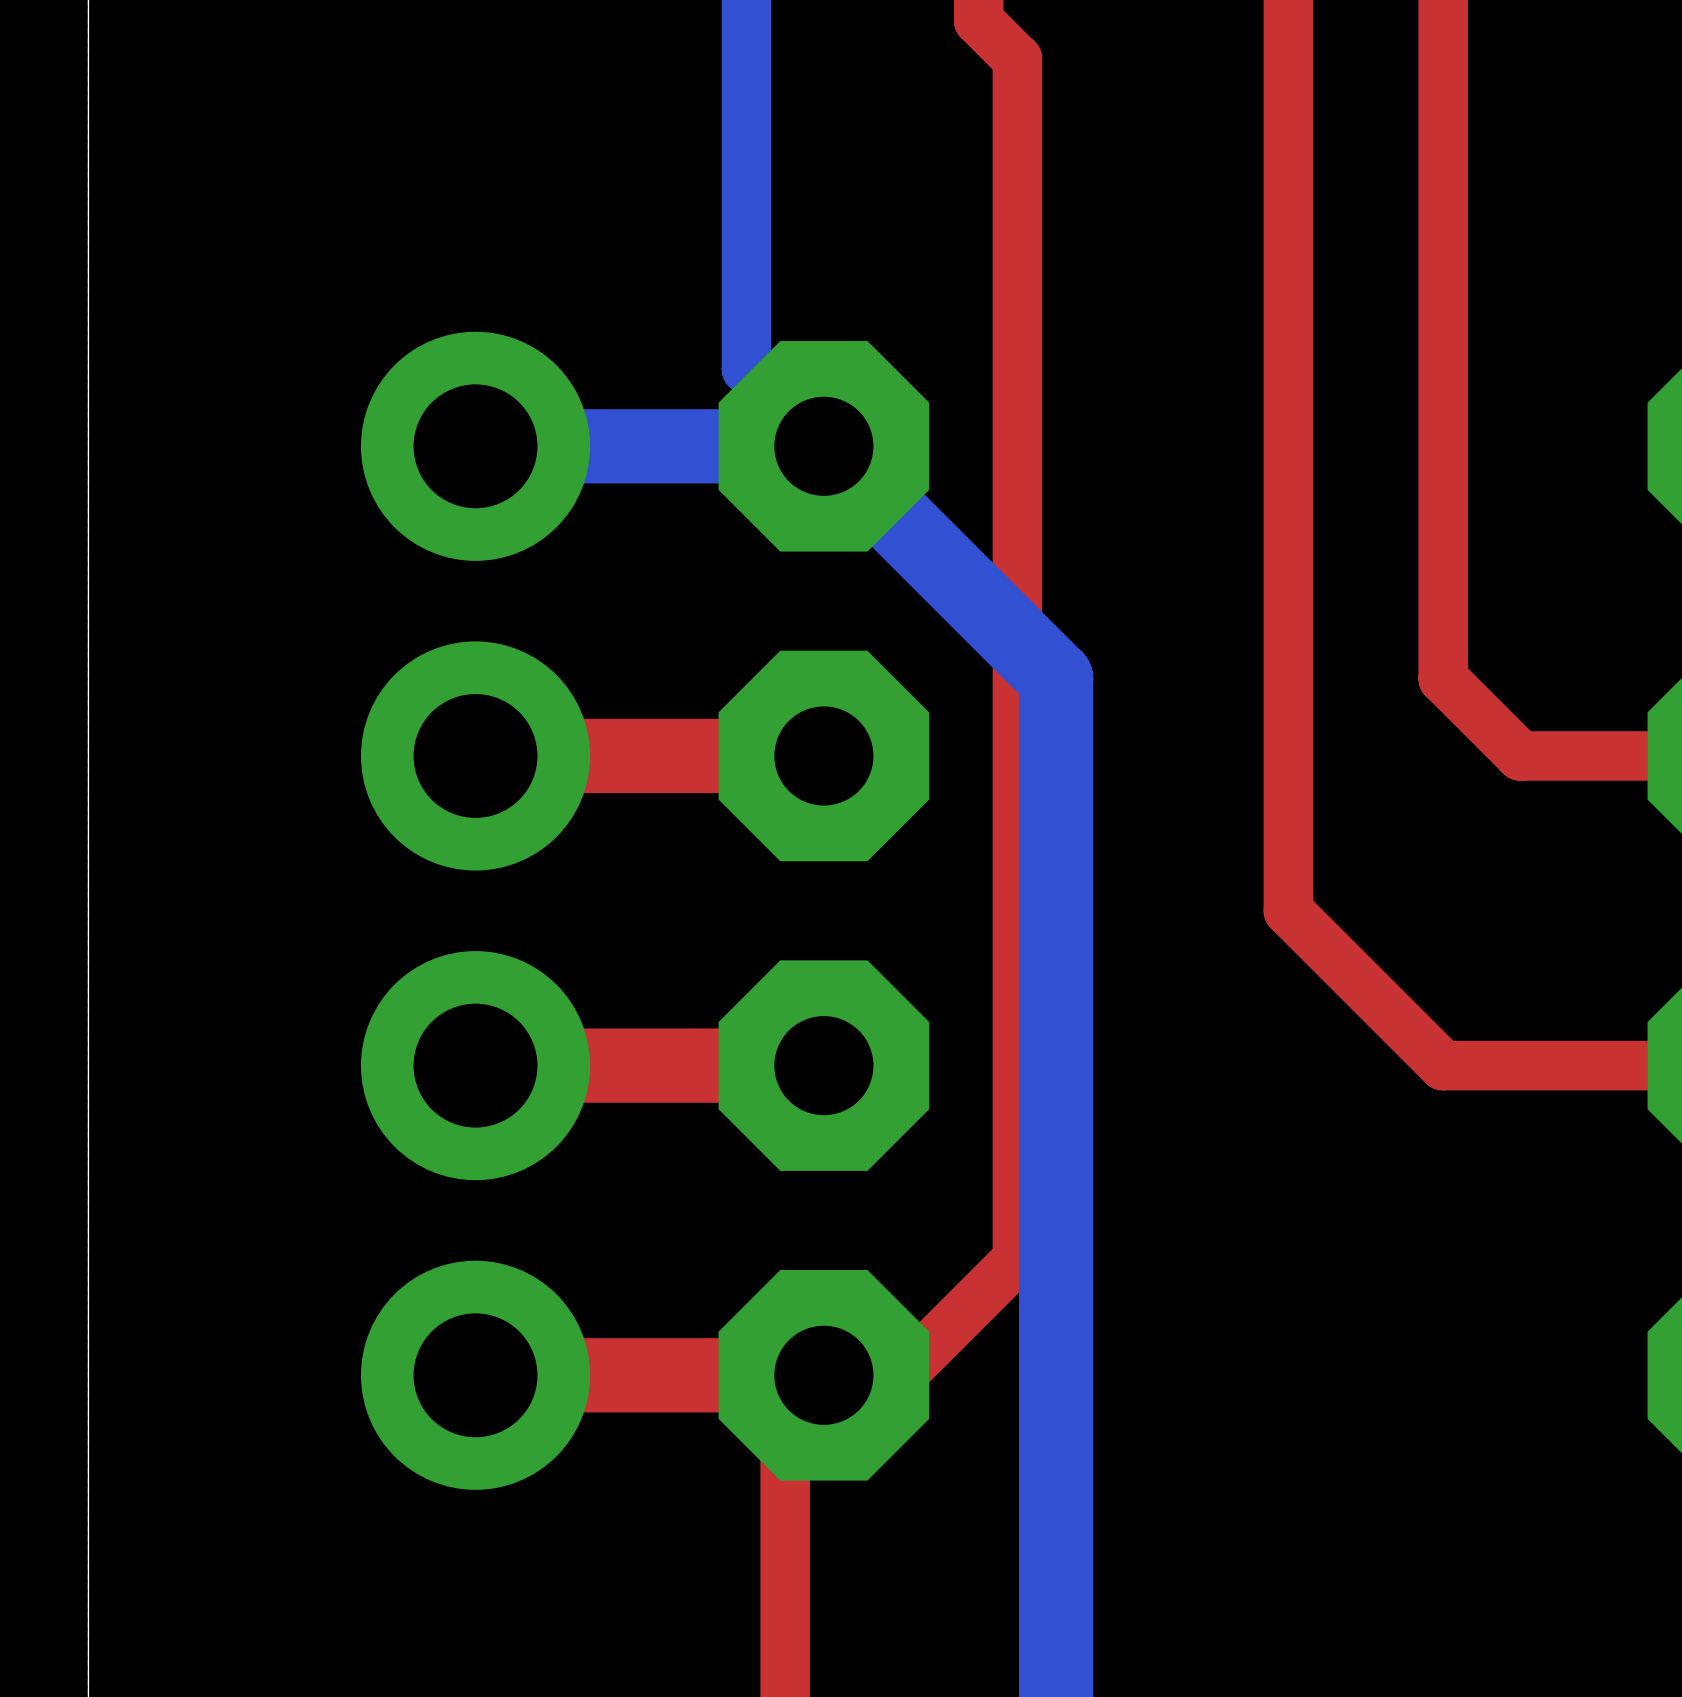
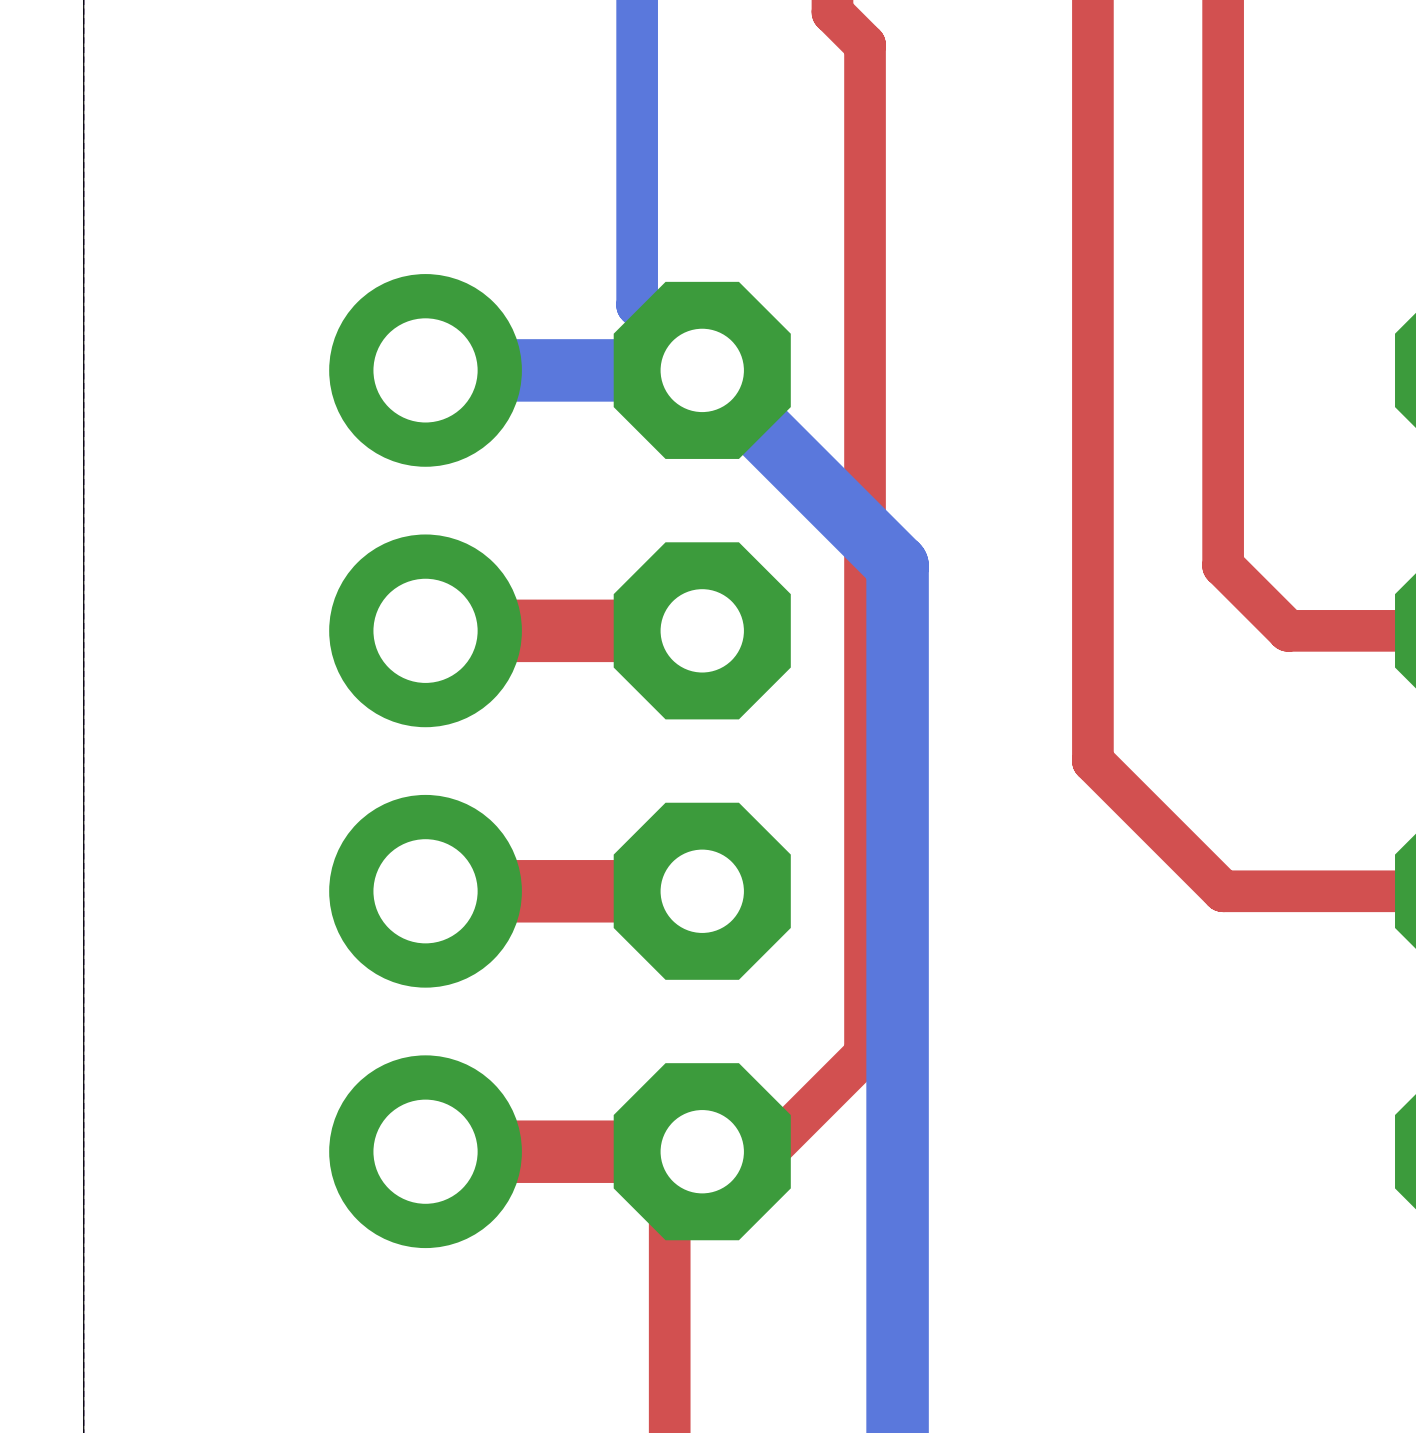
part position: (475, 910) -> (425, 761)

